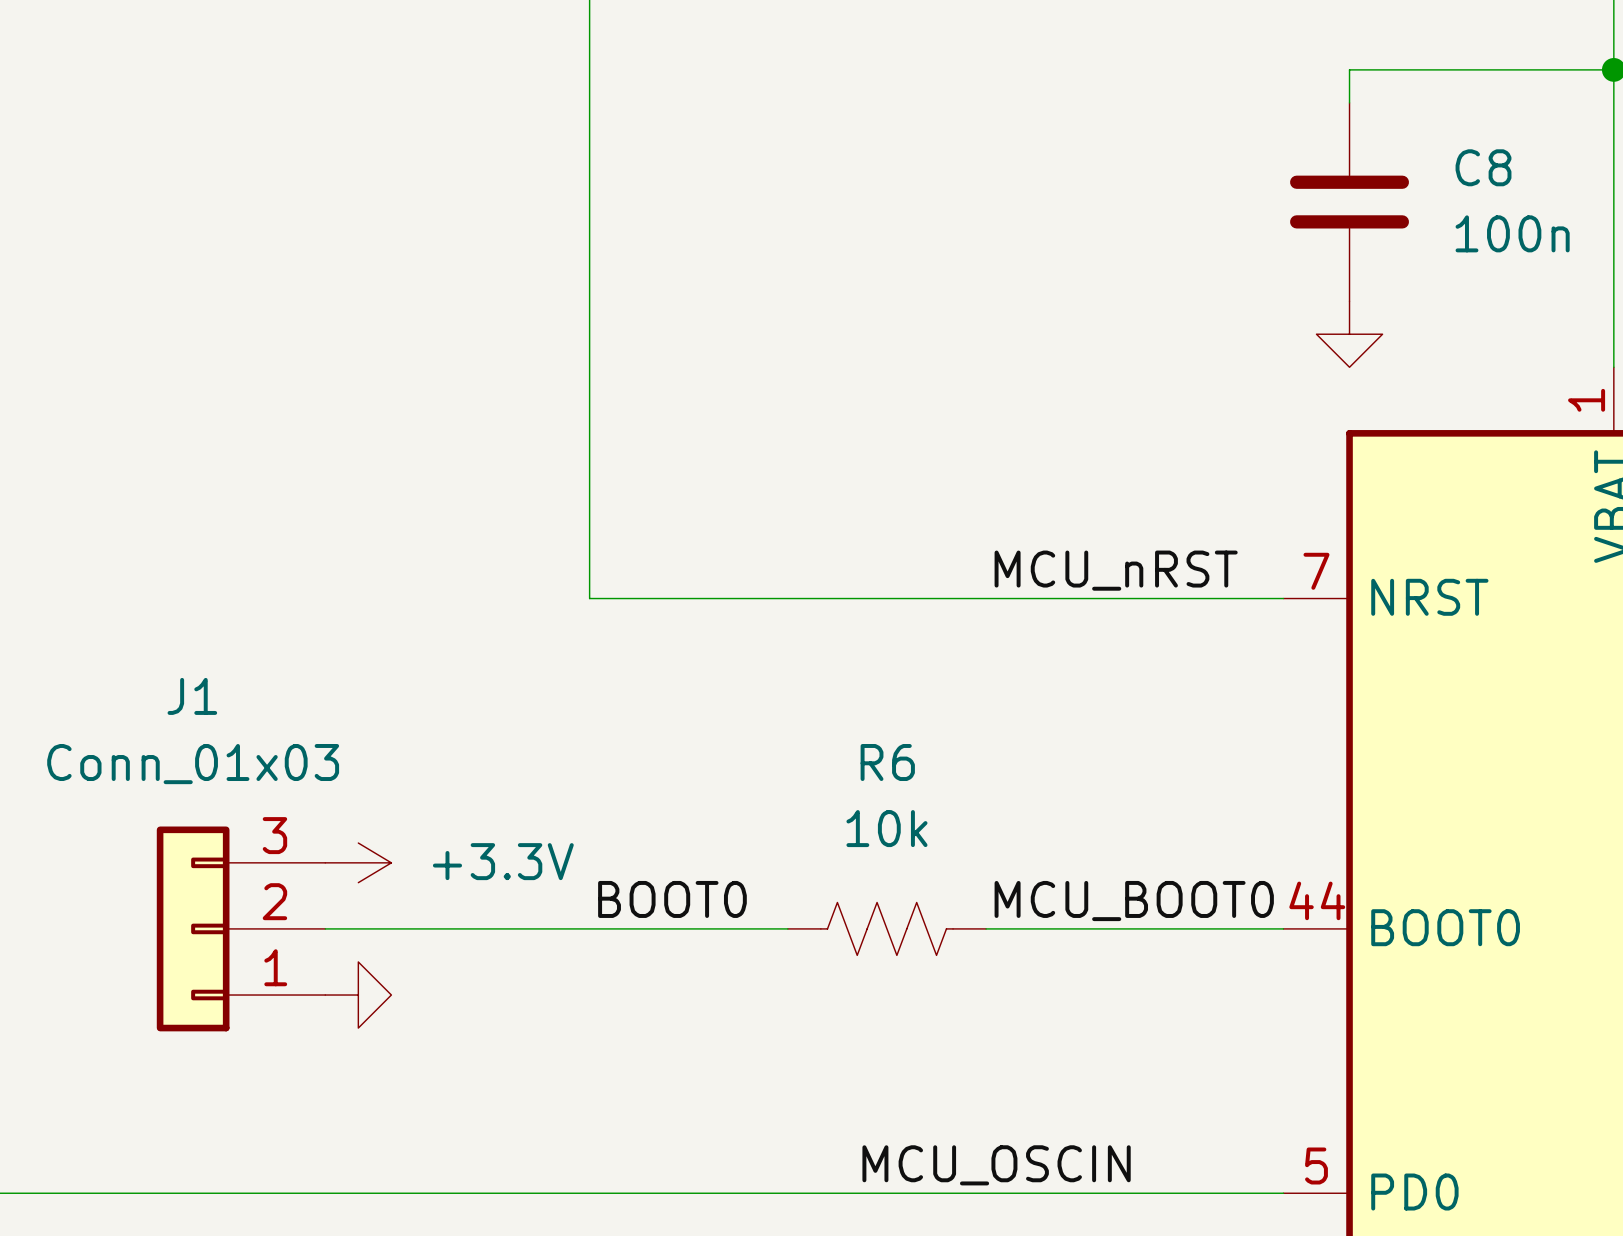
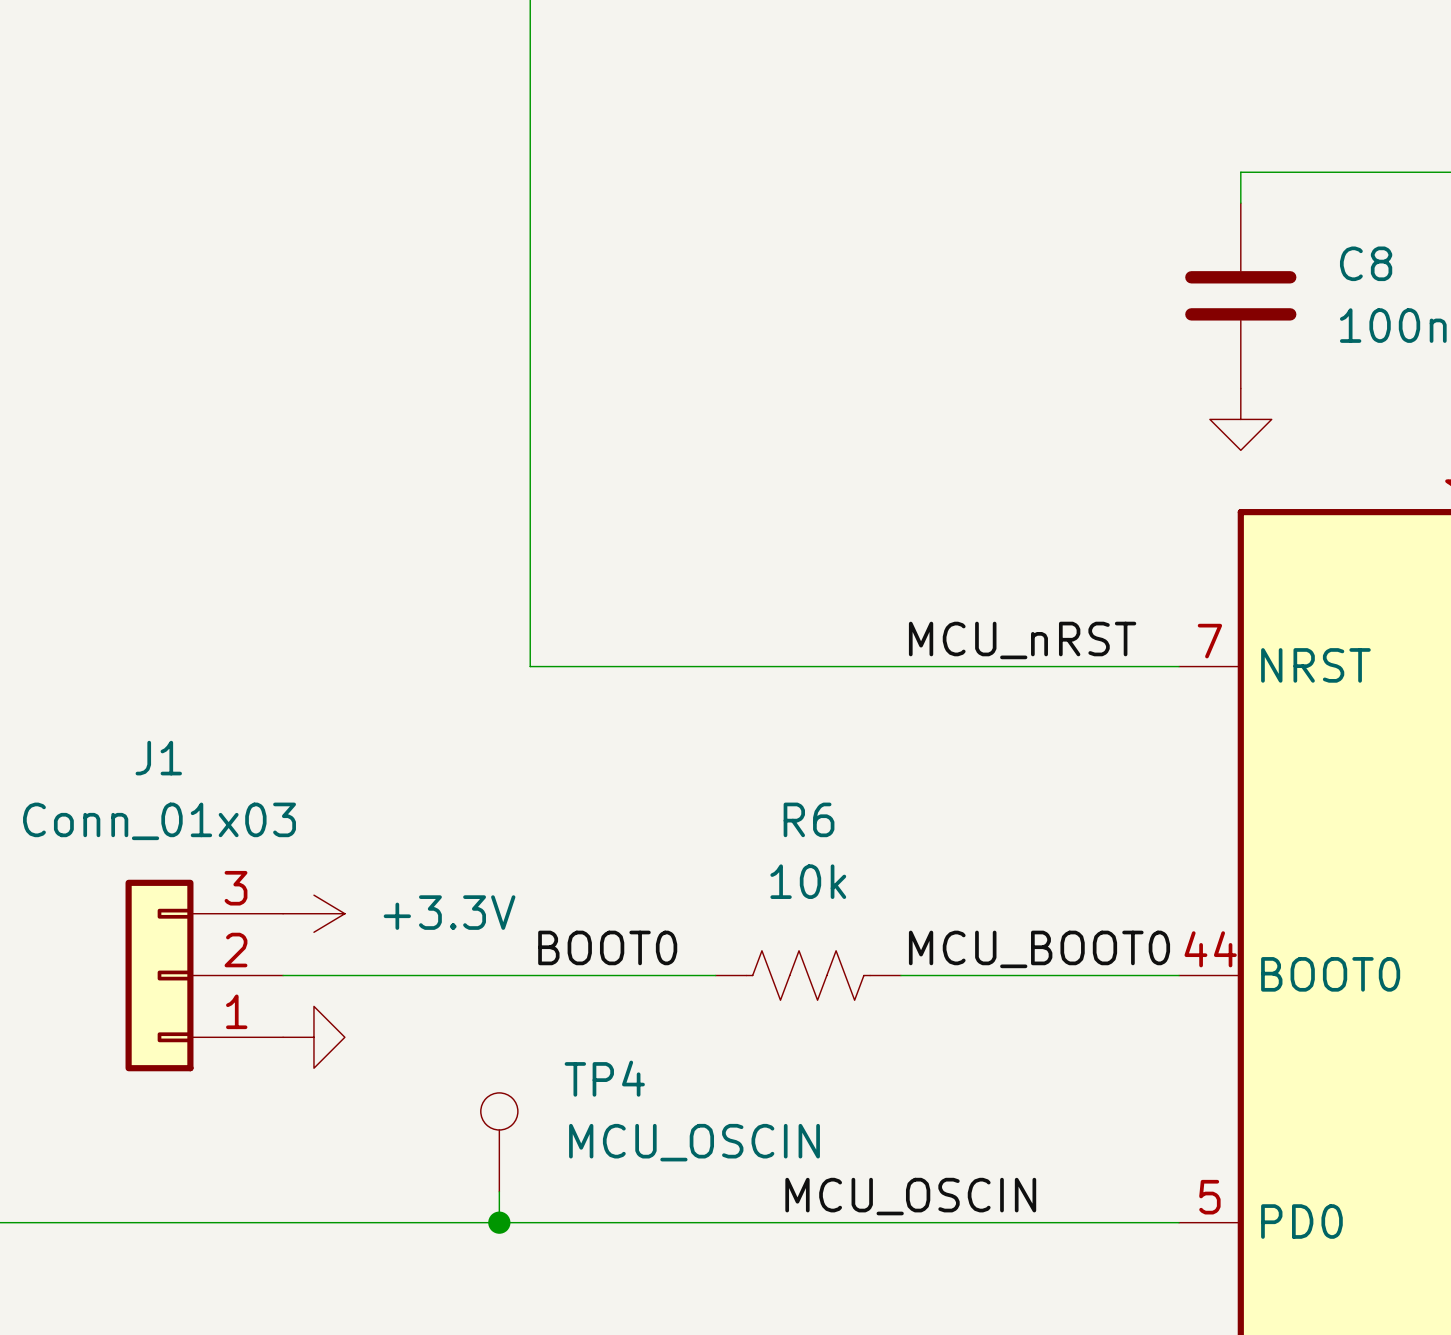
TP4: none -> MCU_OSCIN (499, 1142)
wire: none -> (499, 1191) (499, 1222)
junction: none -> (499, 1222)

